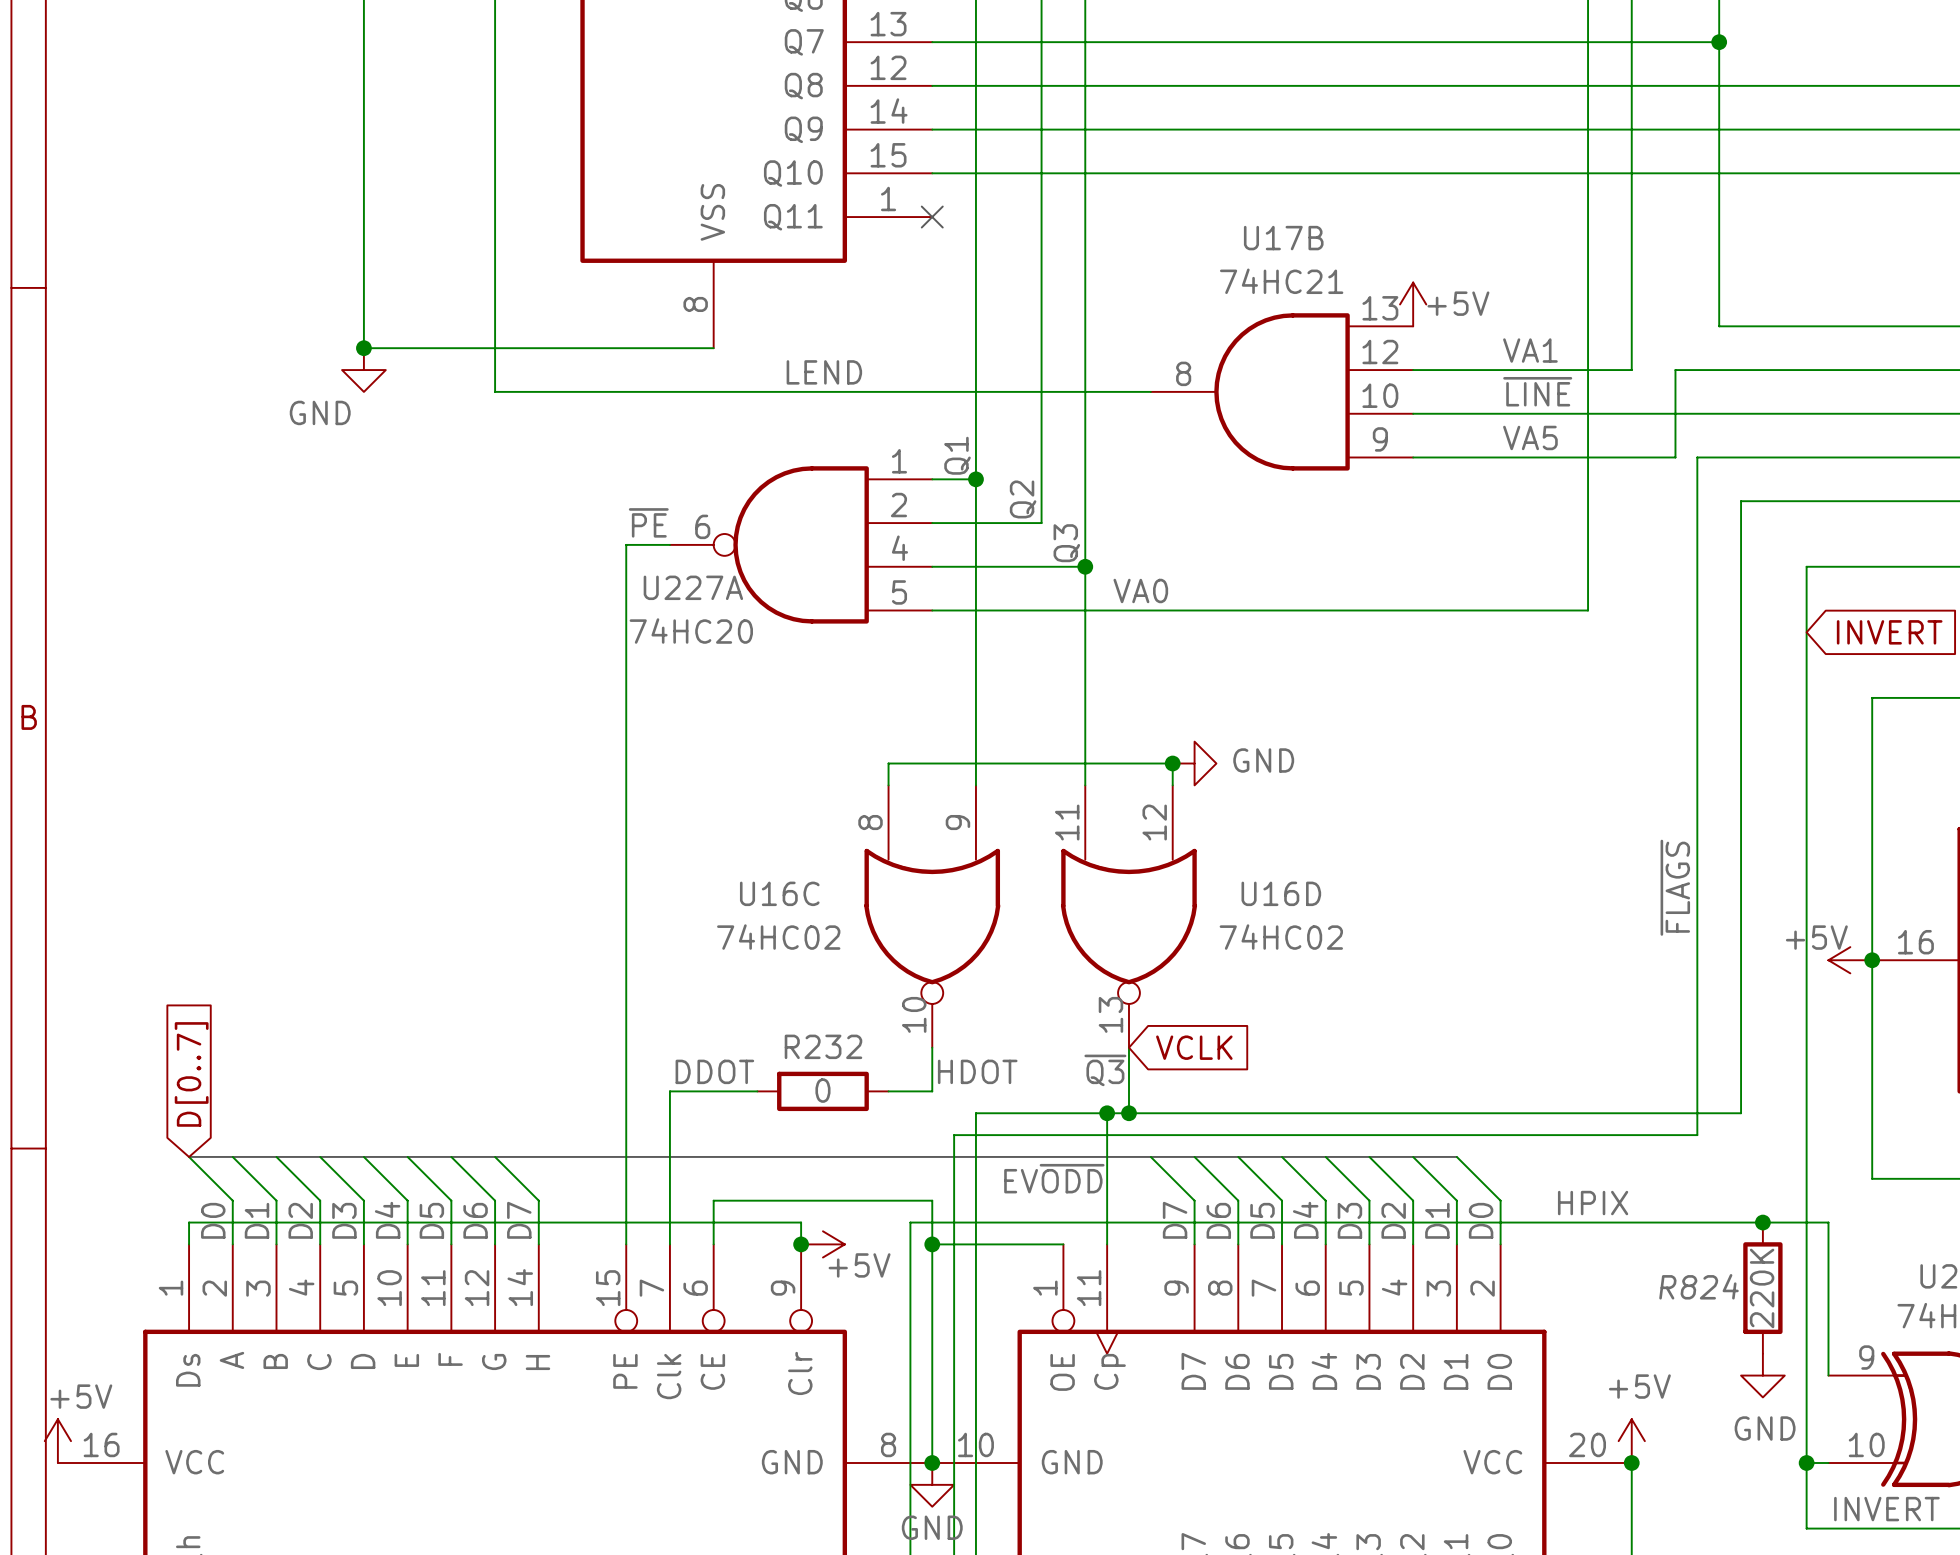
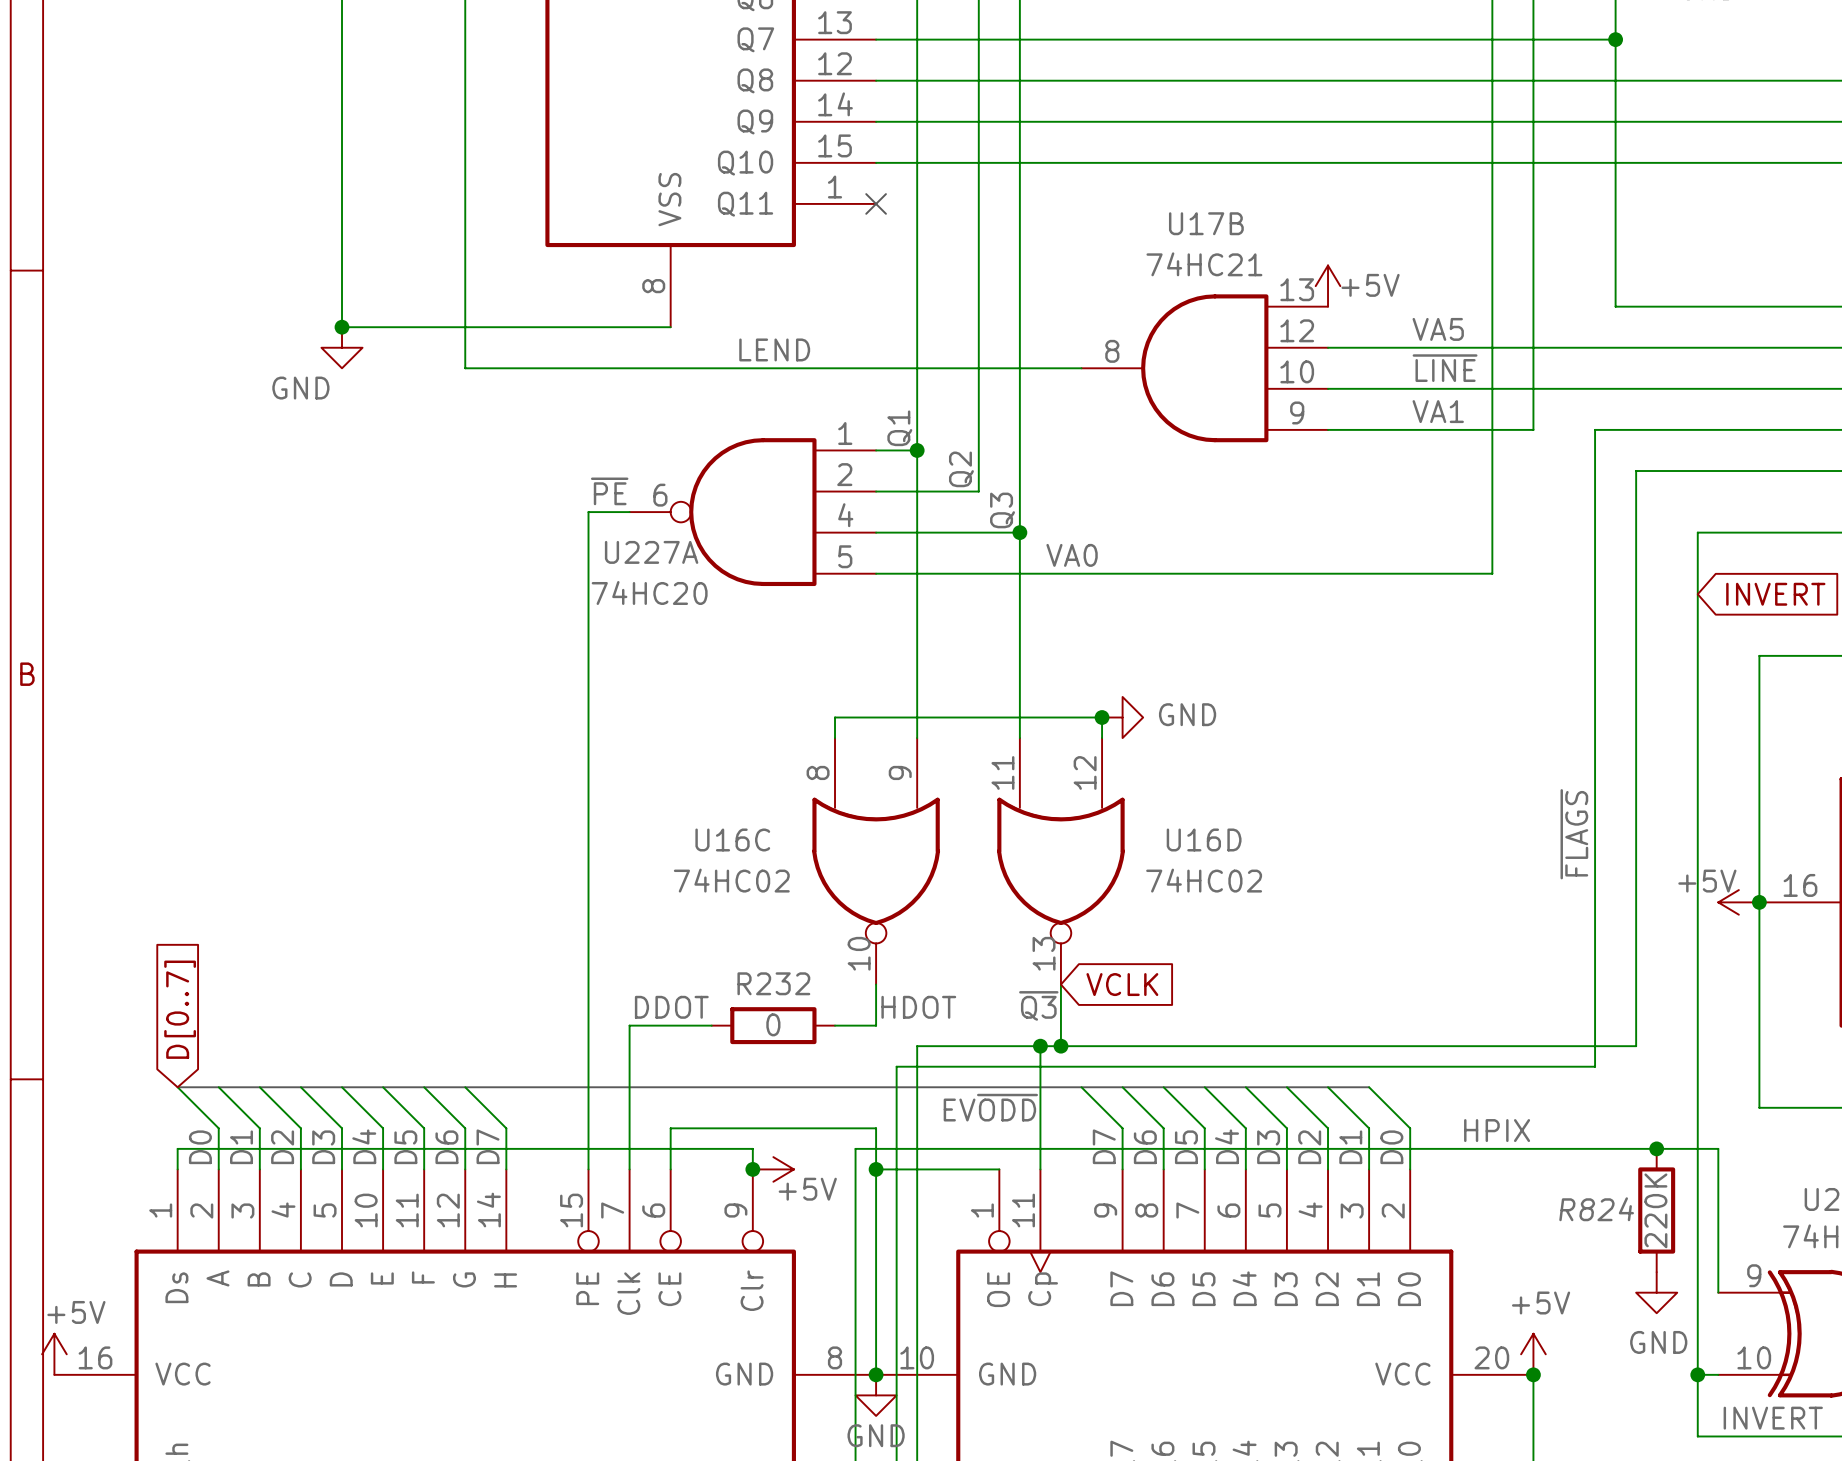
label: VA1 (1530, 350) -> VA5 (1438, 329)
wire: (1675, 370) (1675, 457) (1631, 457) -> (1574, 347) (1533, 347) (1533, 429)
label: VA5 (1530, 437) -> VA1 (1438, 411)

